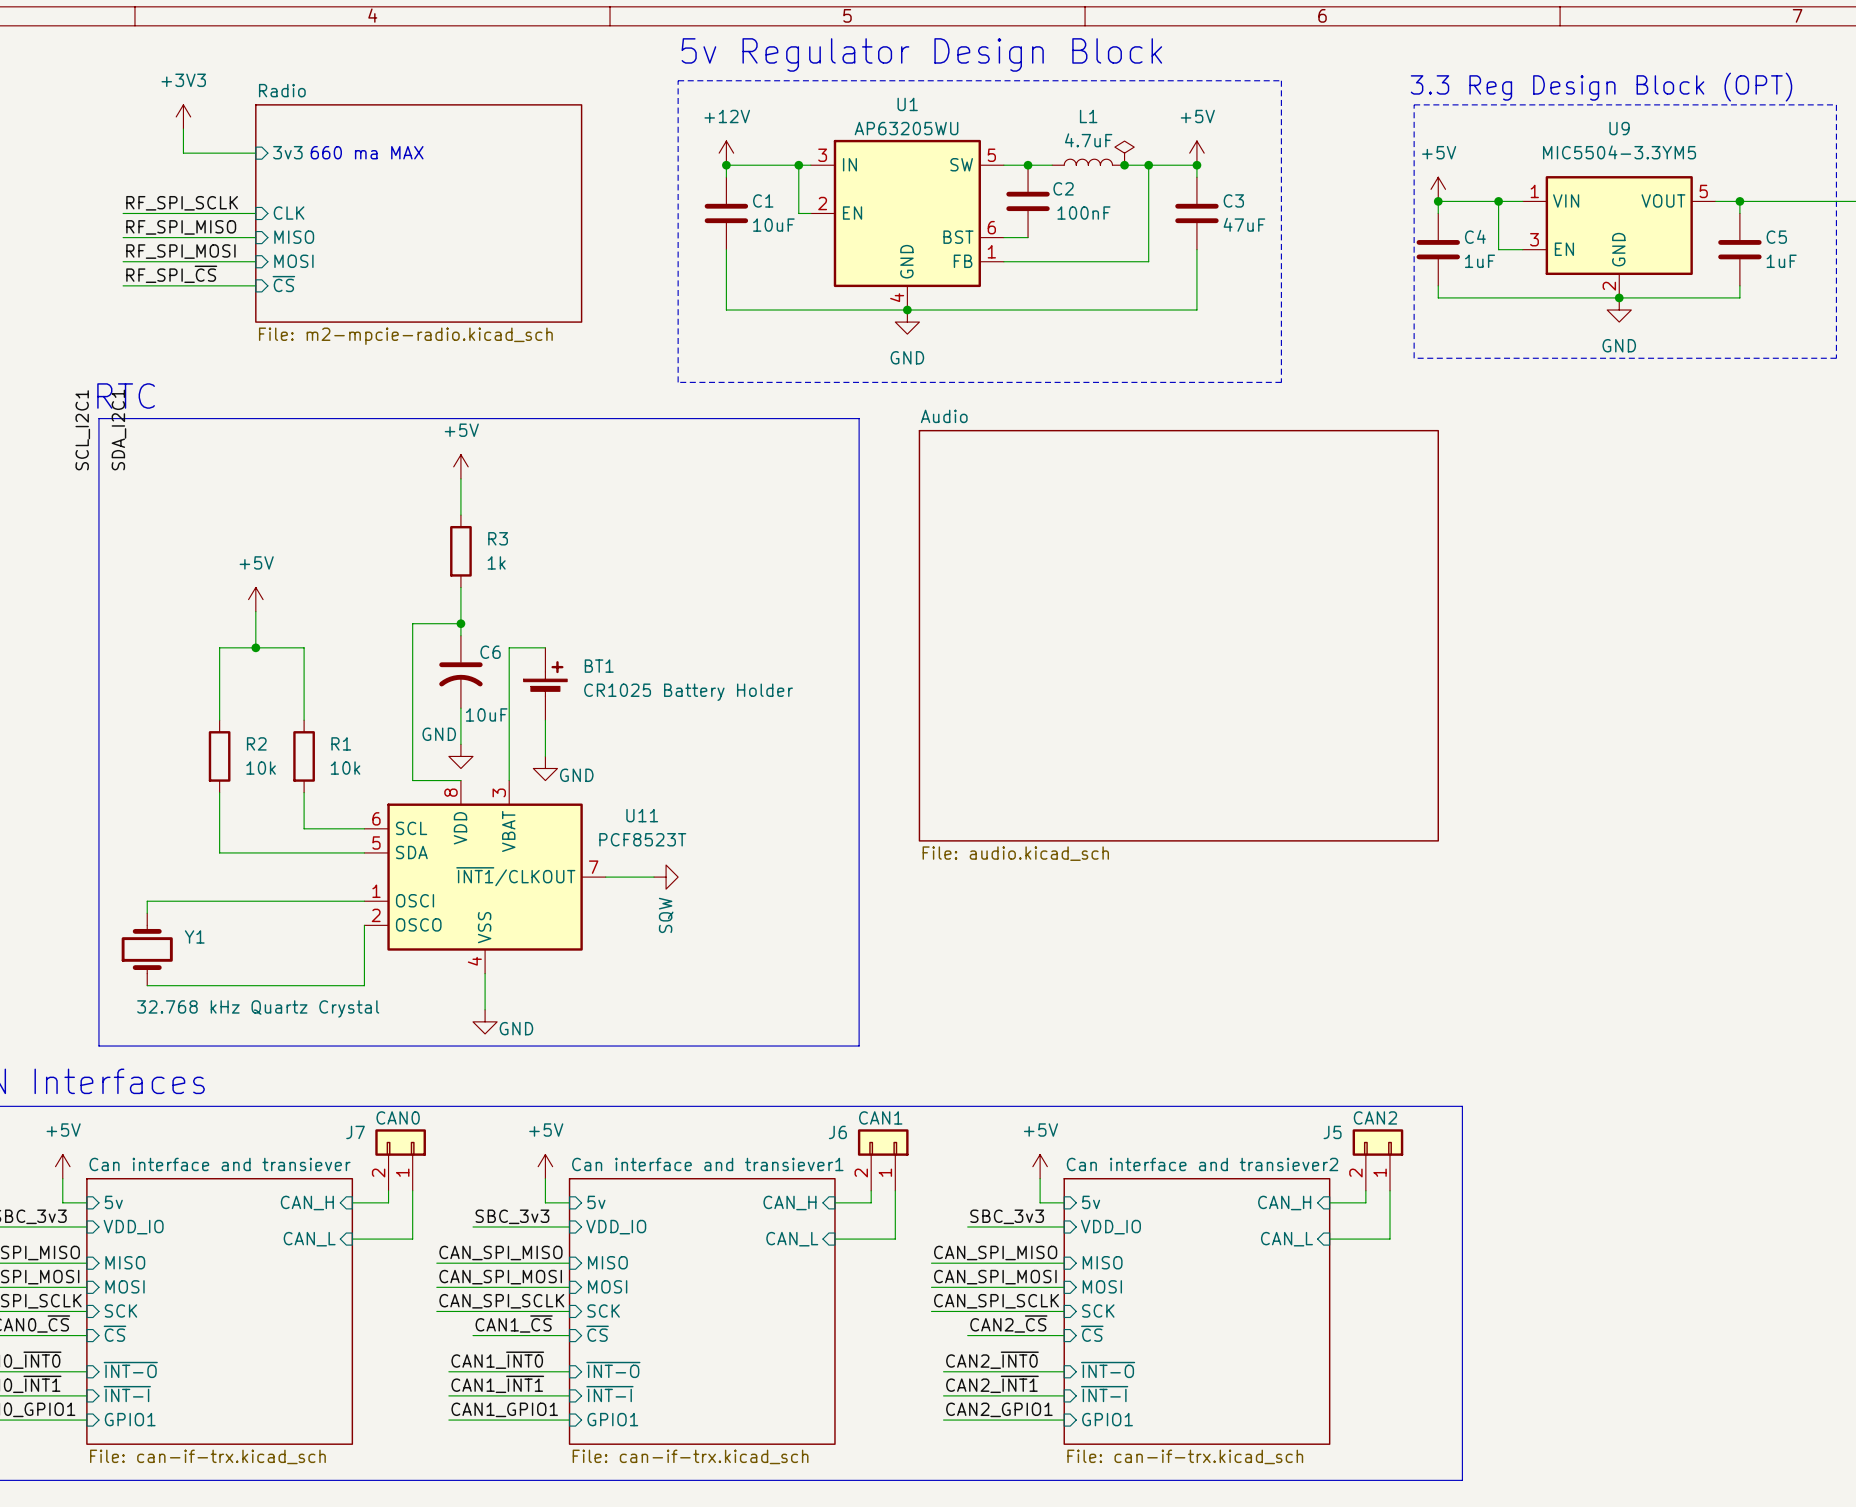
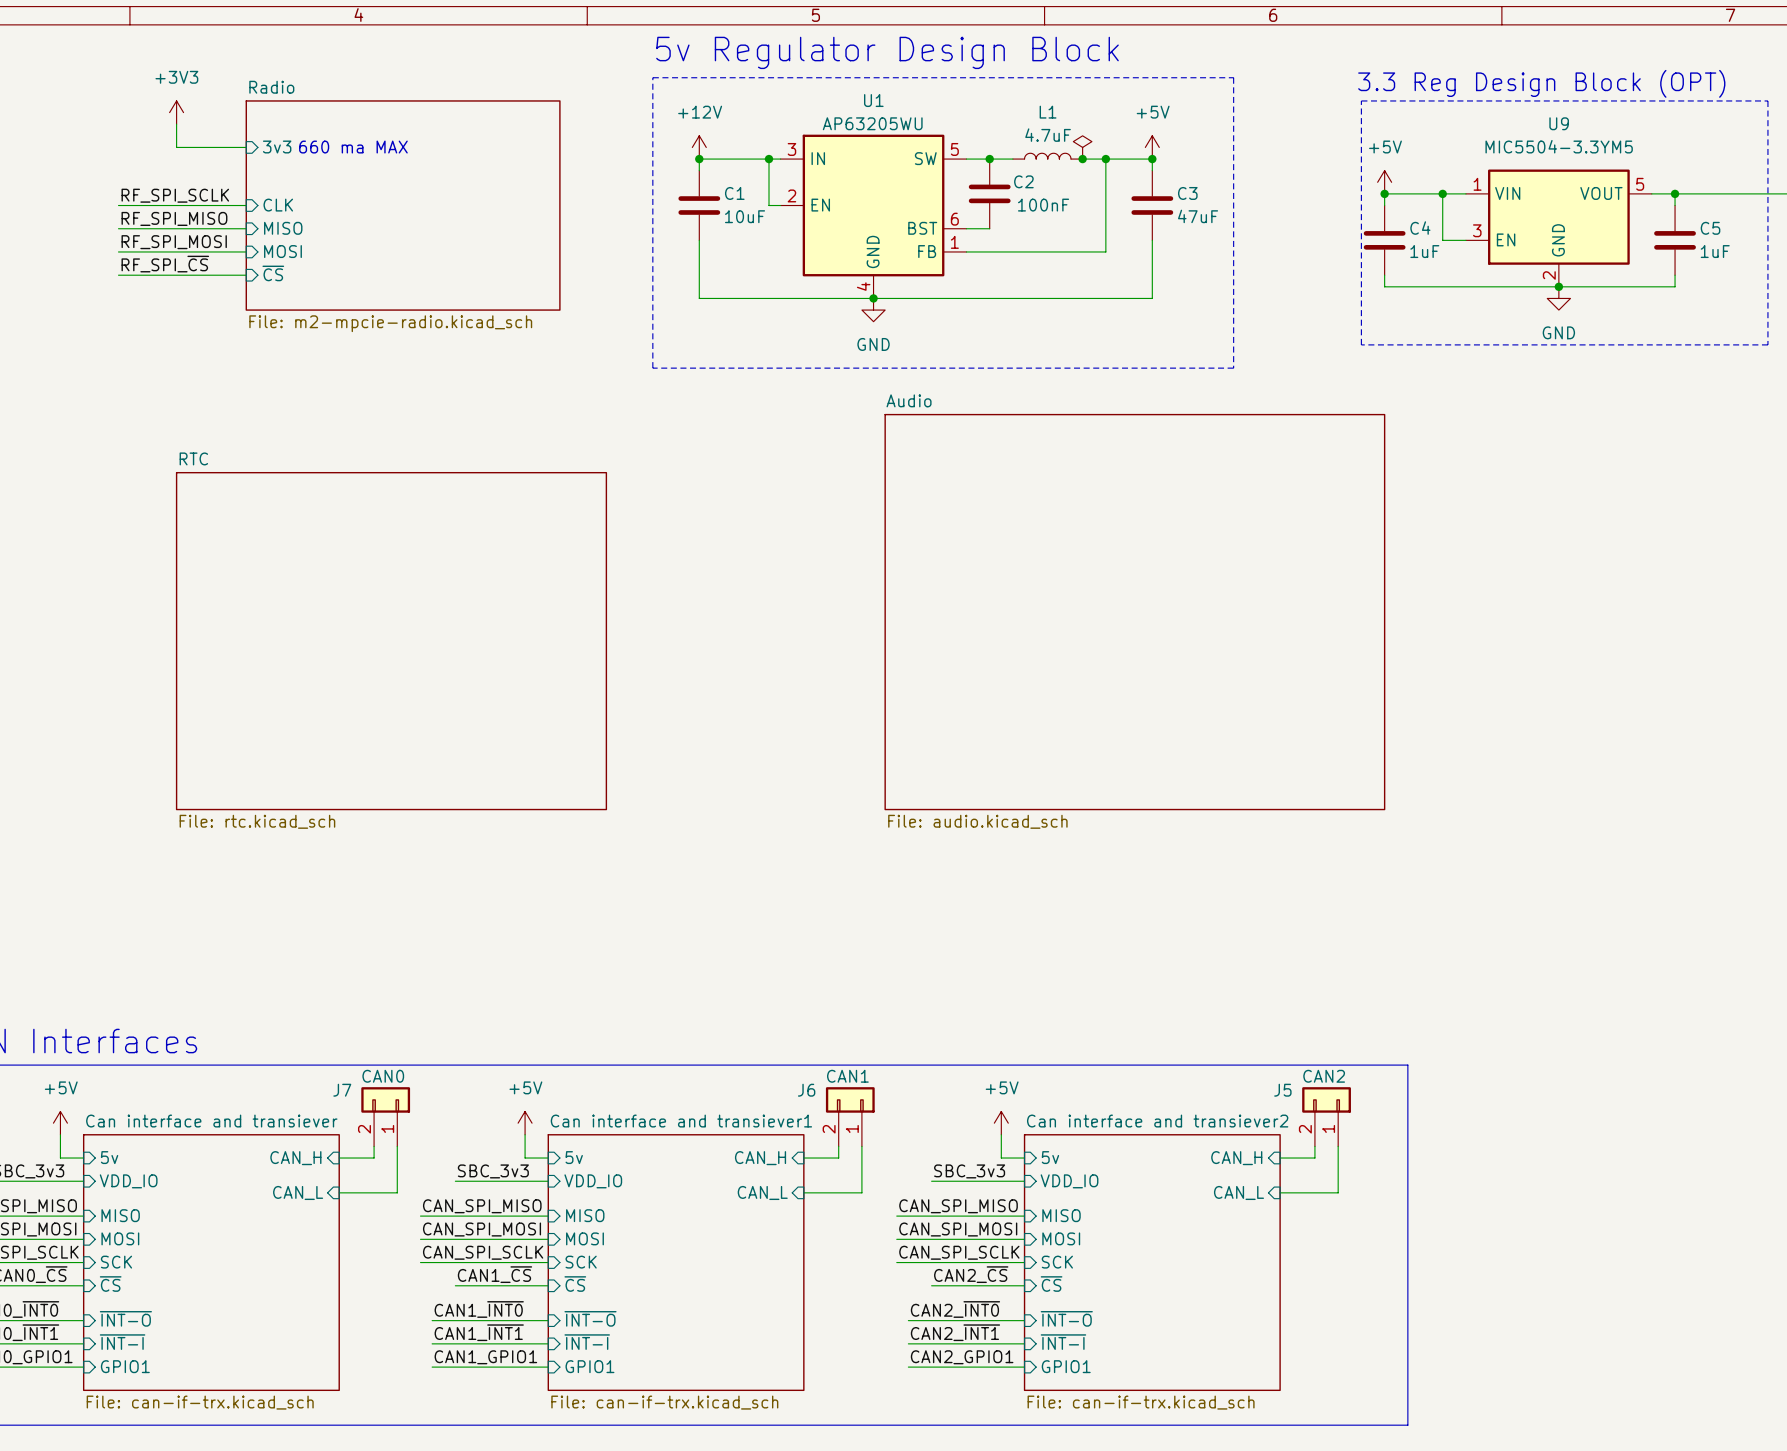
text: RTC (126, 396) -> none
line: (98, 418) (859, 418) (859, 1046) (98, 1046) (98, 418) -> none
label: SDA_I2C1 (118, 429) -> none
label: SCL_I2C1 (82, 430) -> none
power symbol: +5V (460, 466) -> none
wire: (460, 478) (460, 515) -> none
R3: 1k (460, 551) -> none
wire: (460, 587) (460, 635) -> none
power symbol: +5V (255, 599) -> none
wire: (255, 611) (255, 647) -> none
wire: (460, 623) (412, 623) (412, 780) (460, 780) -> none
junction: (460, 623) -> none
junction: (255, 647) -> none
wire: (545, 647) (509, 647) (509, 780) -> none
sheet RTC: none -> File: rtc.kicad_sch (391, 641)
C6: 10uF (460, 671) -> none
BT1: CR1025 Battery Holder (545, 684) -> none
wire: (460, 708) (460, 744) -> none
wire: (219, 720) (219, 647) (304, 647) (304, 720) -> none
wire: (545, 720) (545, 756) -> none
R2: 10k (219, 756) -> none
R1: 10k (304, 756) -> none
power symbol: GND (460, 756) -> none
power symbol: GND (545, 768) -> none
wire: (219, 792) (219, 852) (364, 852) -> none
wire: (304, 792) (304, 828) (364, 828) -> none
U11: PCF8523T (485, 877) -> none
wire: (605, 877) (653, 877) -> none
power symbol: SQW (666, 877) -> none
wire: (364, 901) (147, 901) (147, 913) -> none
wire: (364, 925) (364, 985) (147, 985) -> none
Y1: 32.768 kHz Quartz Crystal (147, 949) -> none
wire: (485, 973) (485, 1009) -> none
power symbol: GND (485, 1021) -> none

